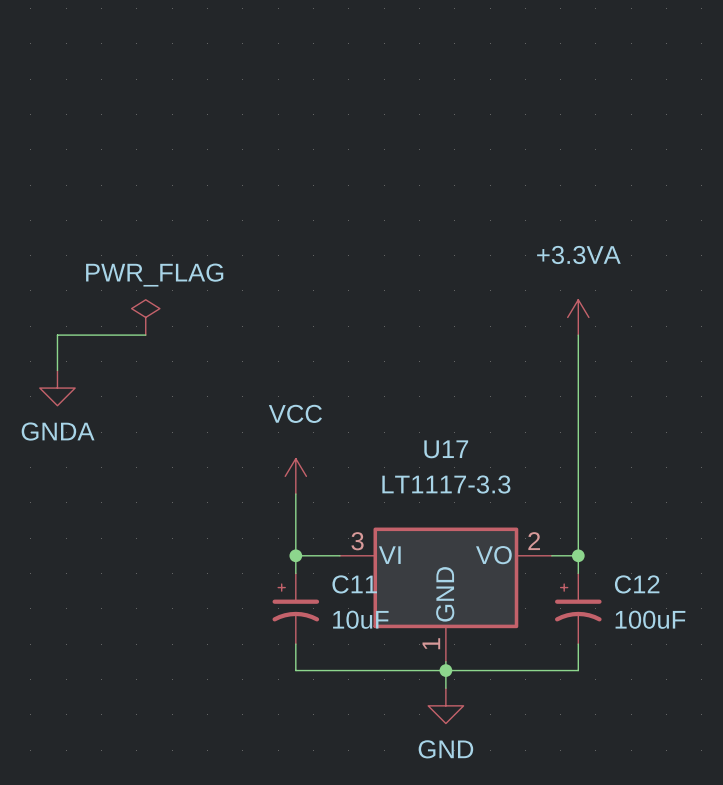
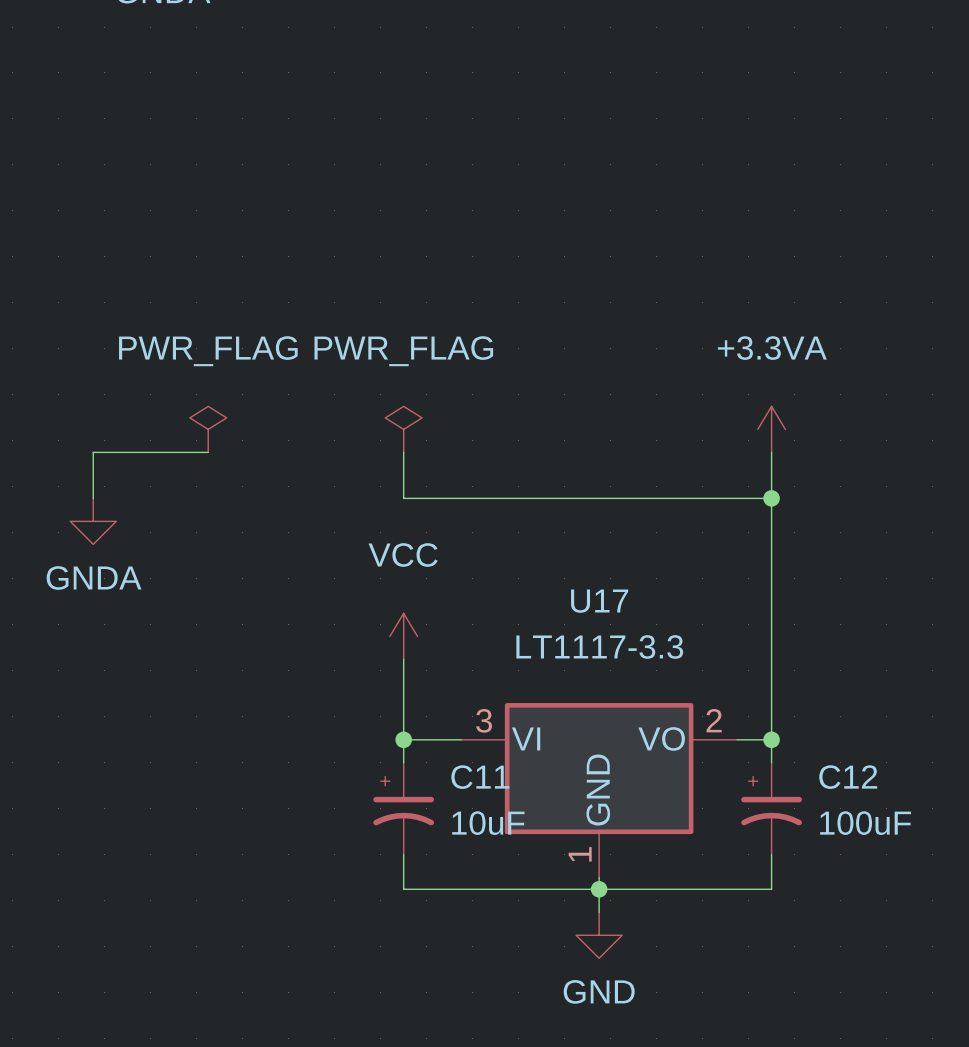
power symbol text position: PWR_FLAG (154, 275) -> PWR_FLAG (208, 351)
power symbol: none -> PWR_FLAG (403, 429)
wire: none -> (403, 452) (403, 498) (771, 498)
junction: none -> (771, 498)

